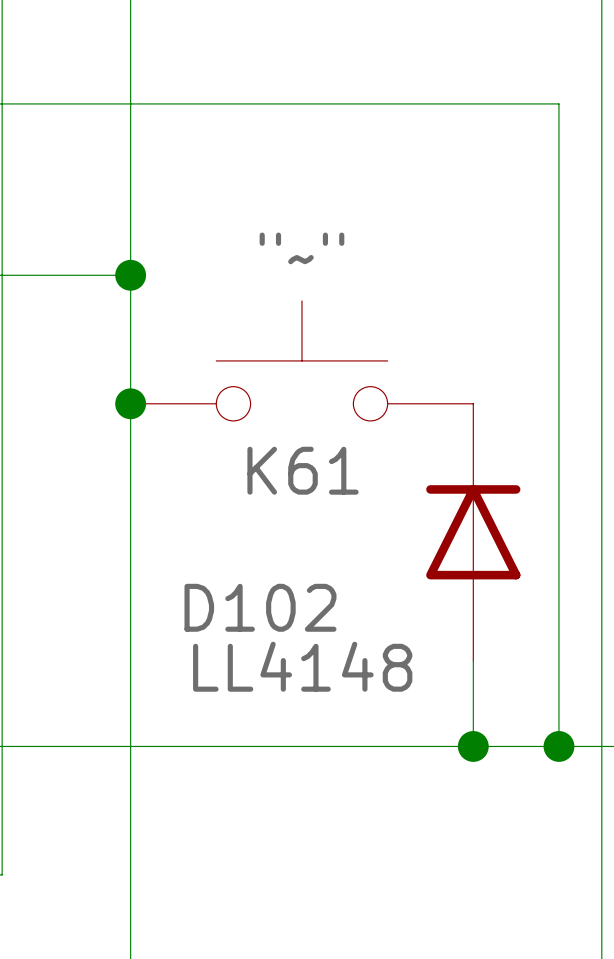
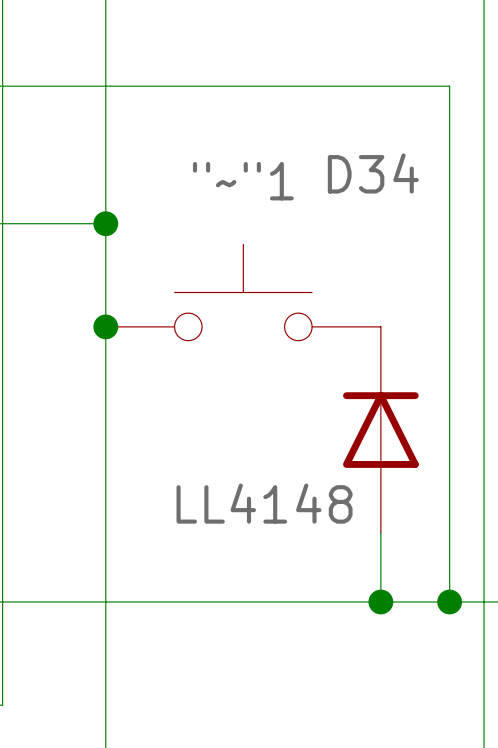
K61 value: "~" (301, 248) -> none
K61 name: K61 (303, 470) -> "~"1 (243, 181)
D102 name: D102 (260, 607) -> D34 (373, 173)
D102 value position: LL4148 (302, 666) -> LL4148 (264, 503)

